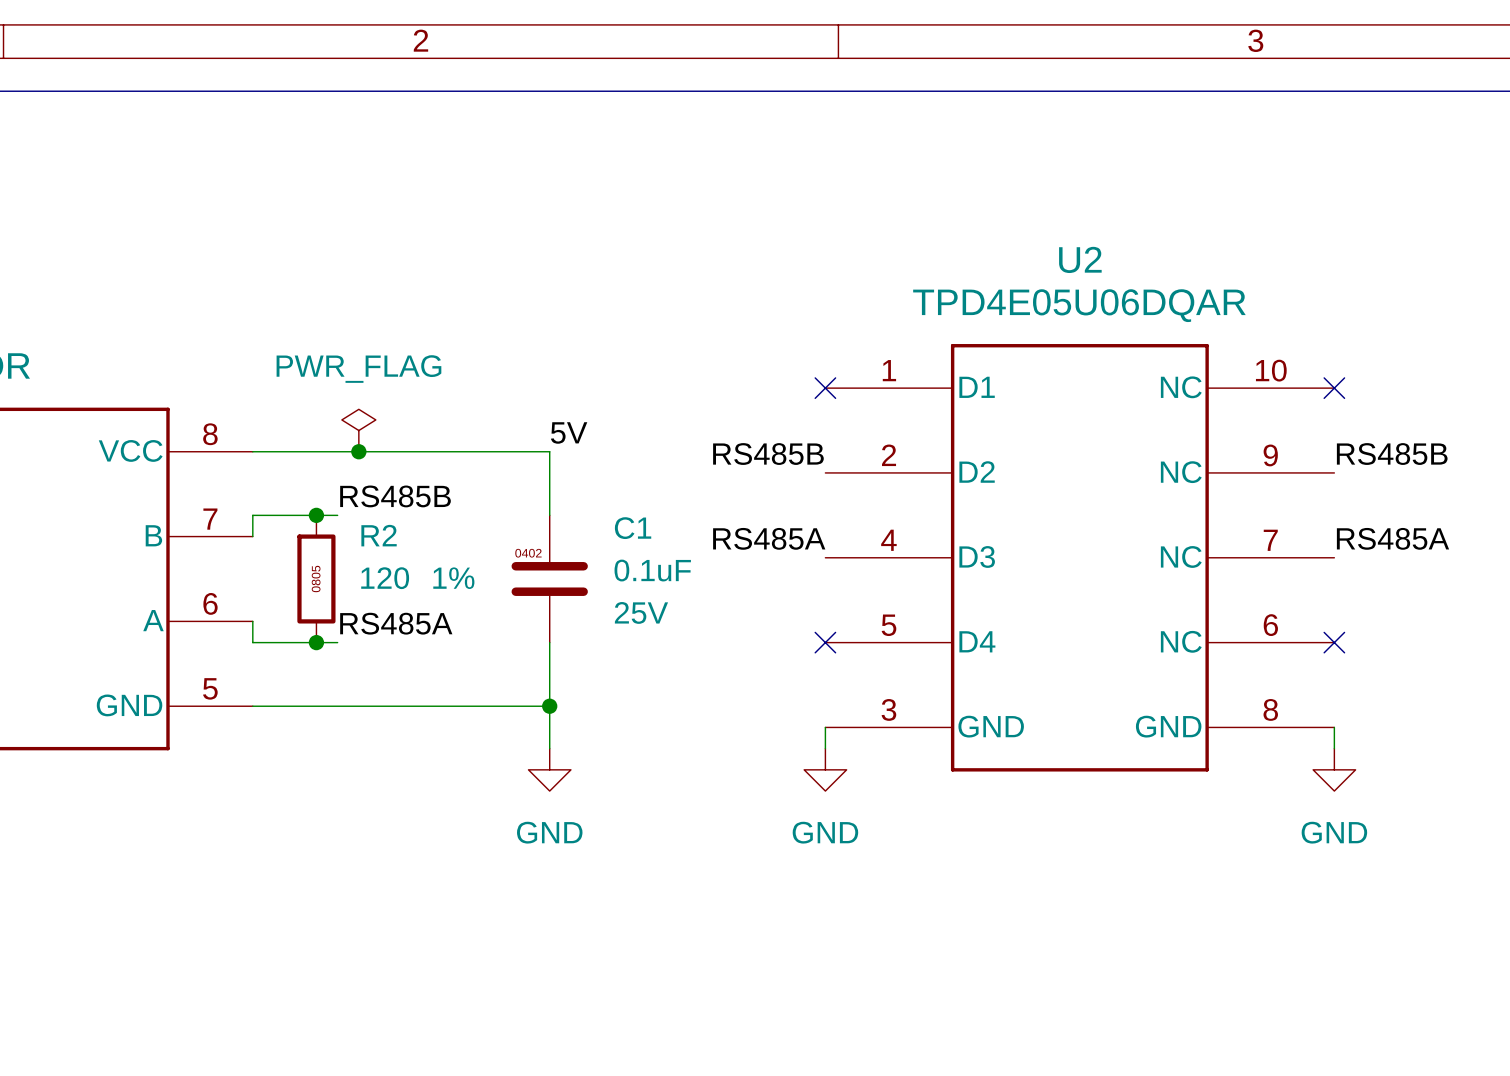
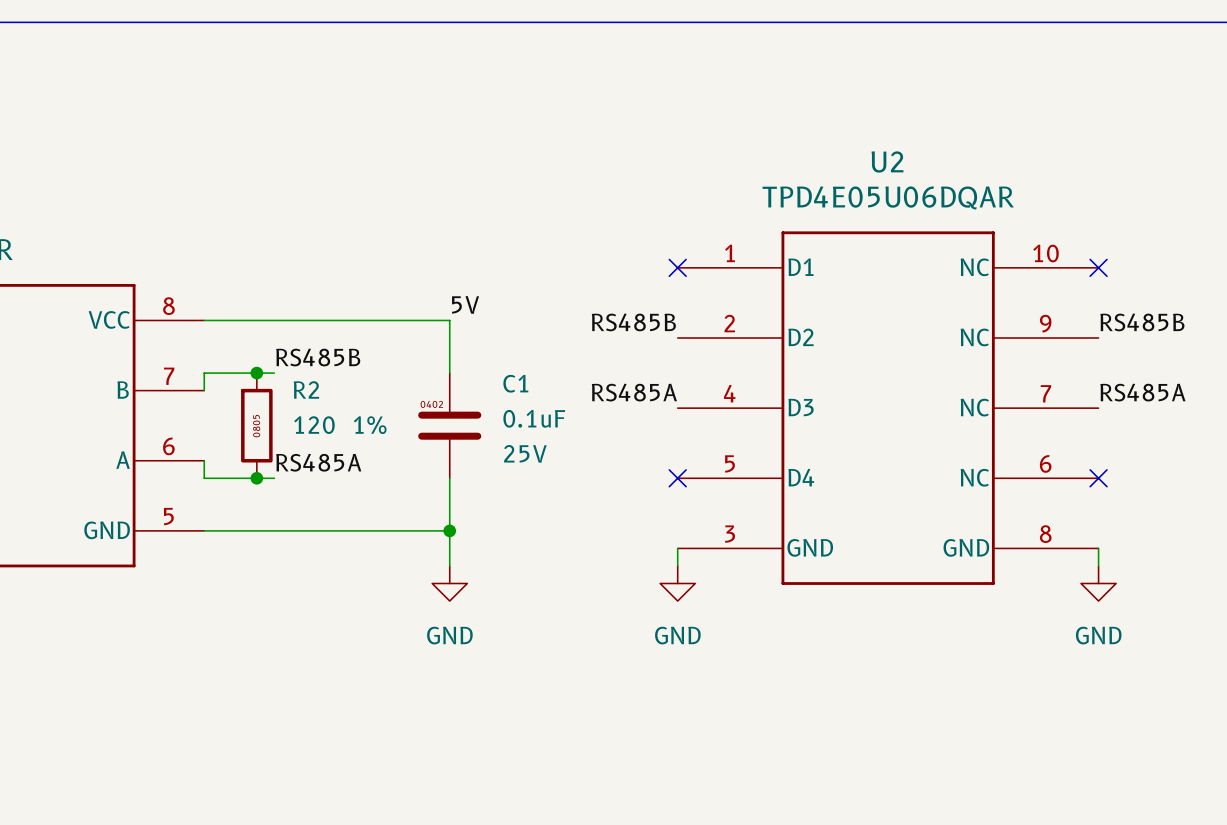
power symbol: PWR_FLAG (358, 430) -> none
junction: (358, 451) -> none

